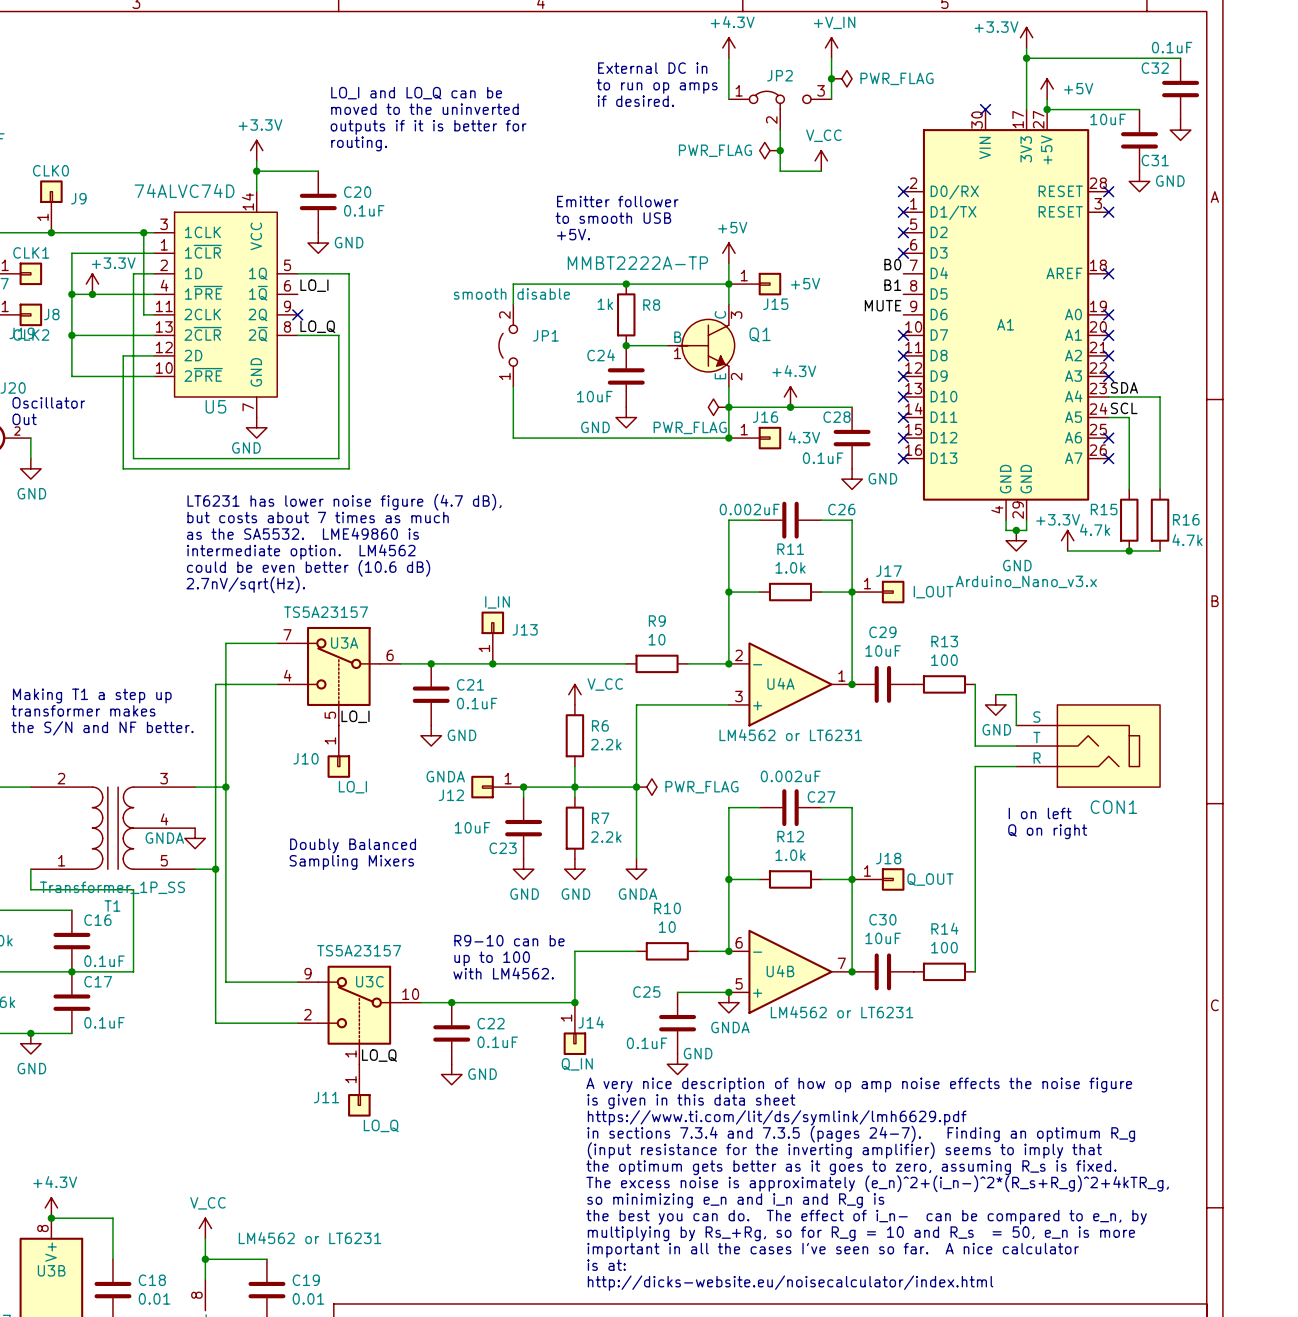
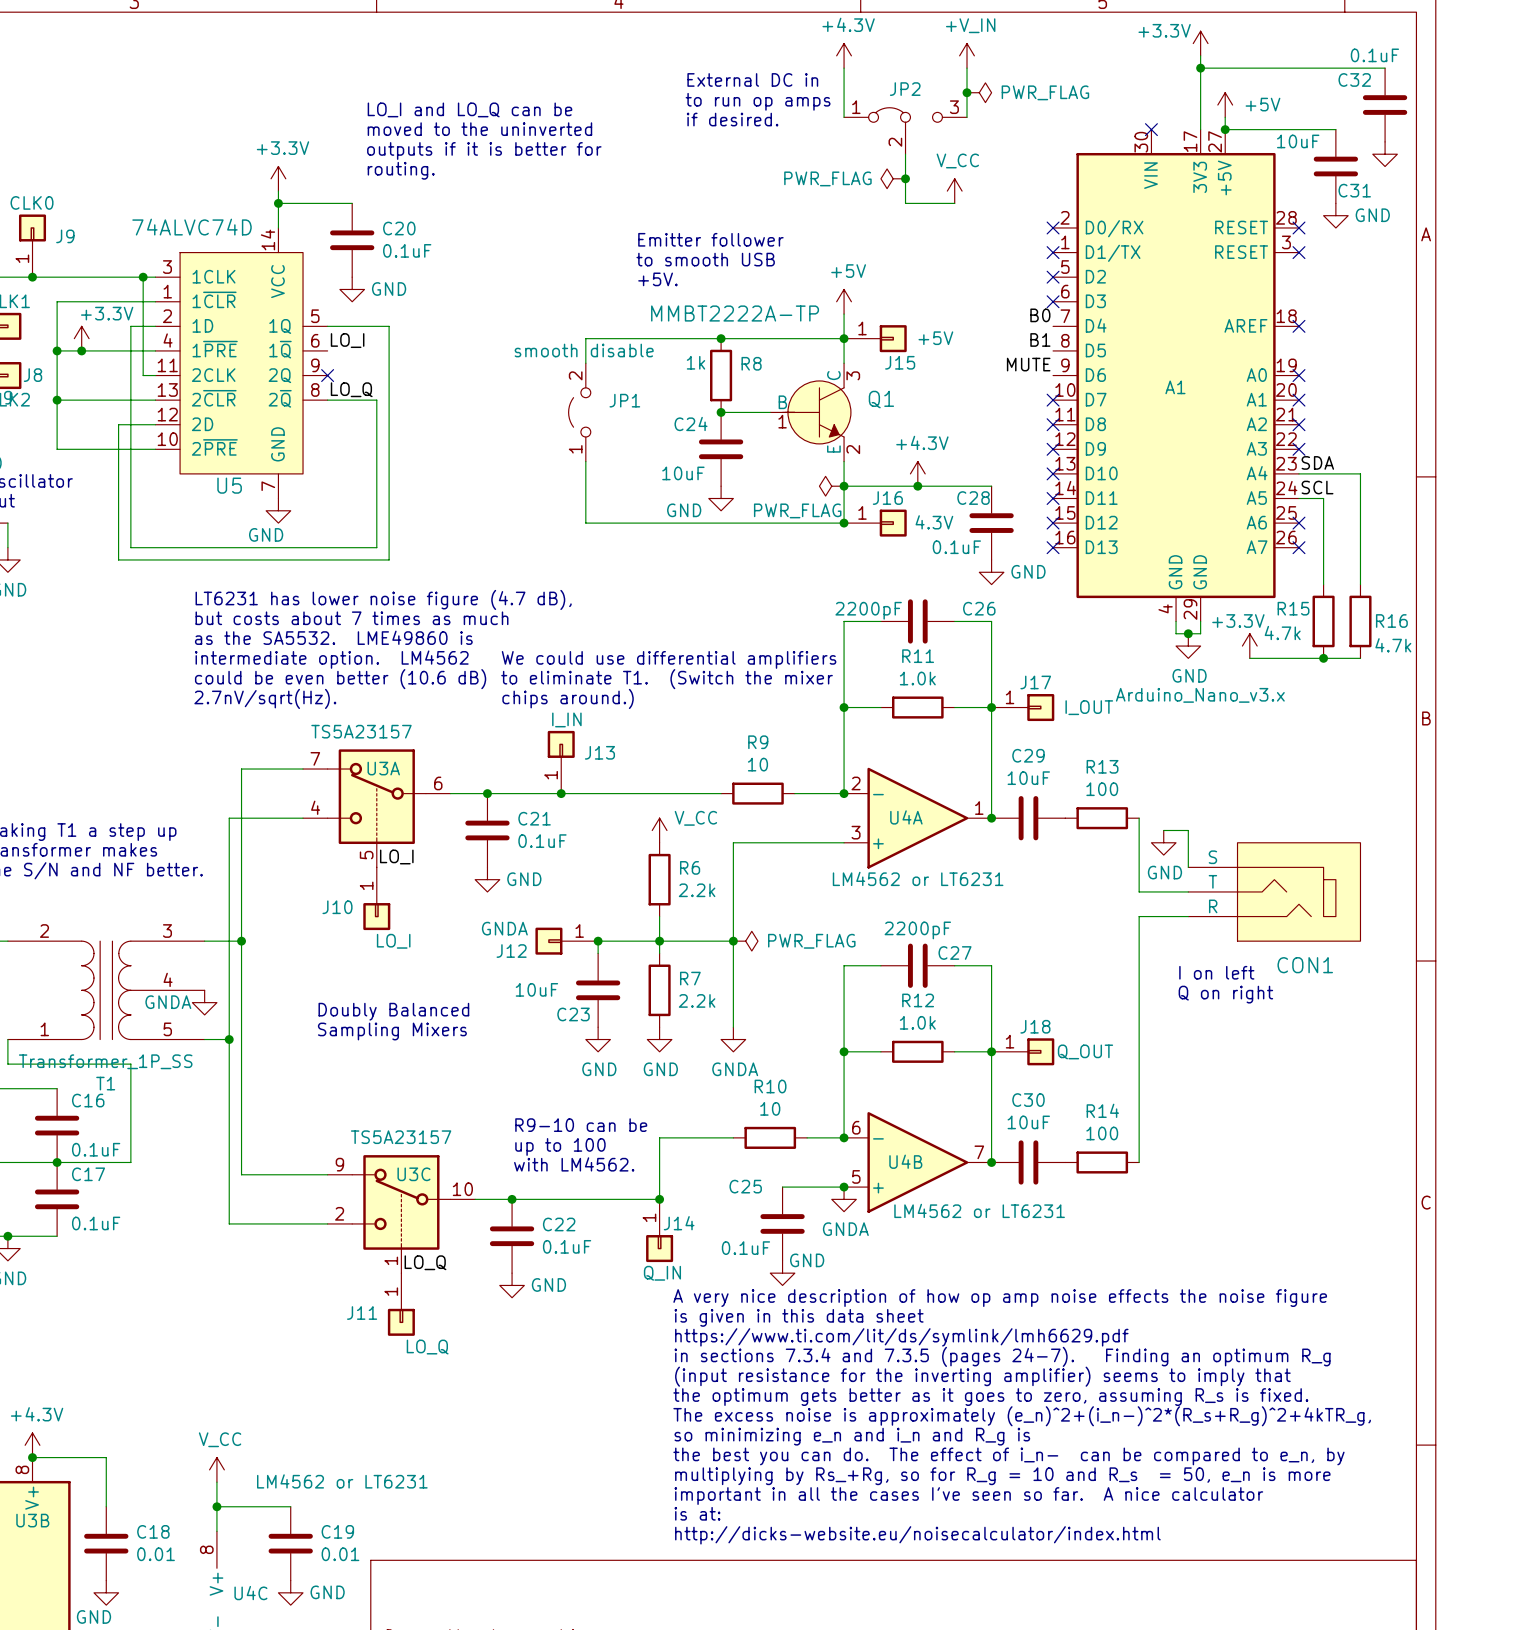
C26 value: 0.002uF (749, 509) -> 2200pF (868, 610)
text: none -> We could use differential amplifiers (669, 659)
text: none -> to eliminate T1. (Switch the mixer (667, 679)
text: none -> chips around.) (568, 698)
C27 value: 0.002uF (790, 776) -> 2200pF (917, 930)

